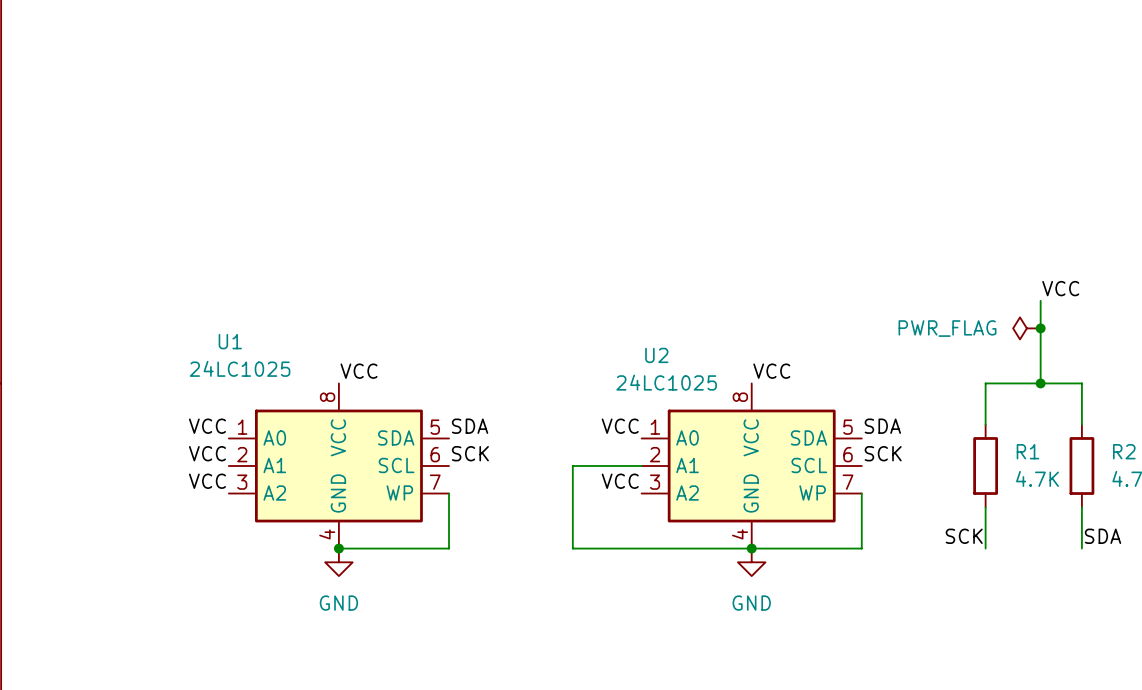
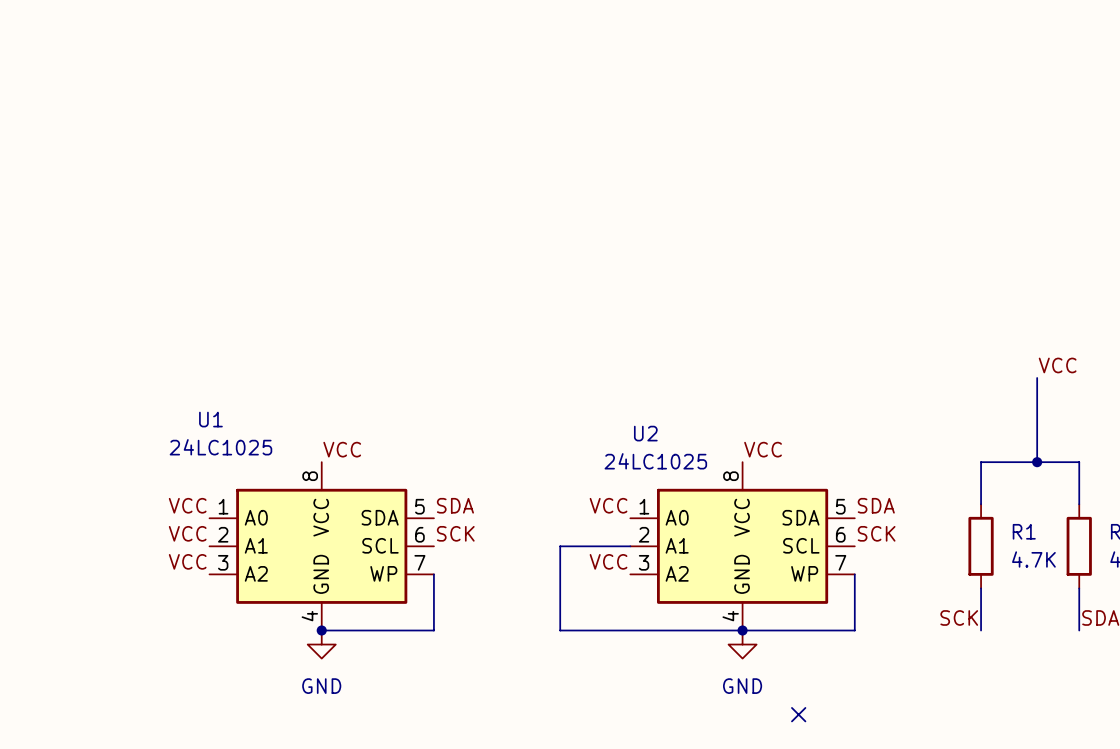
power symbol: PWR_FLAG (1026, 328) -> none
junction: (1040, 328) -> none
no-connect mark: none -> (798, 714)

